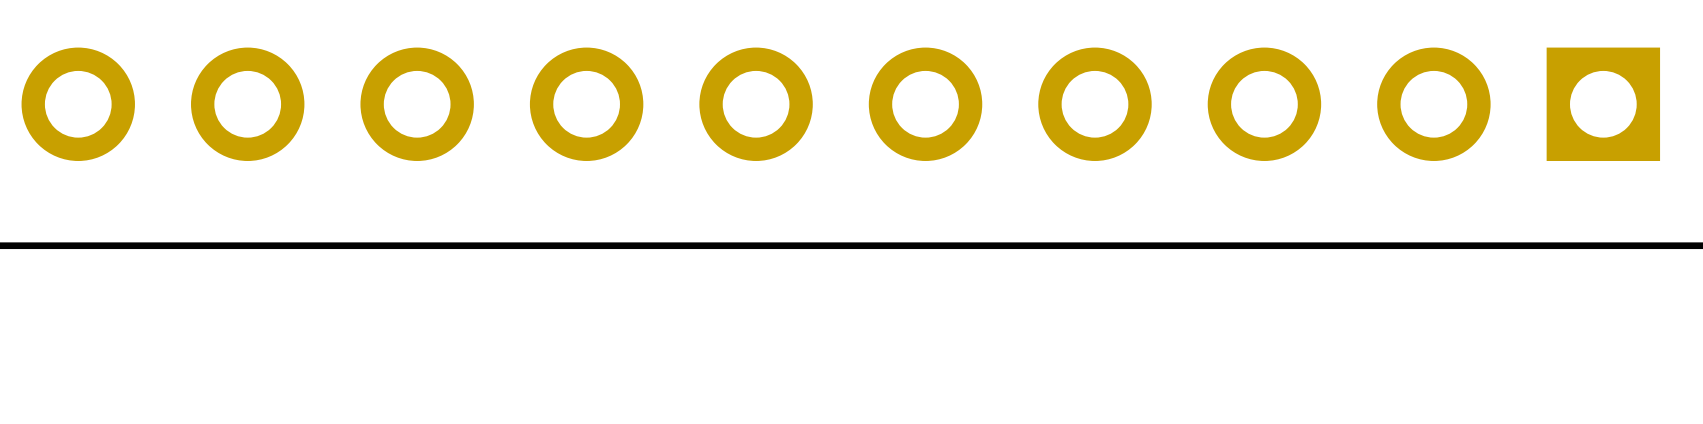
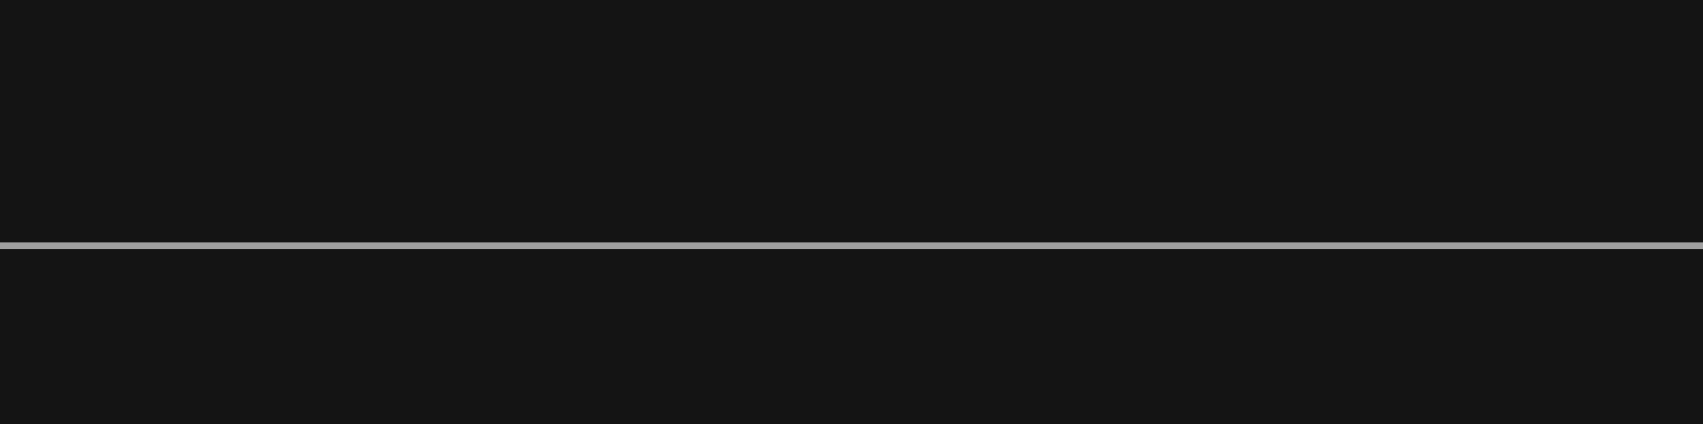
part: (840, 104) -> none

